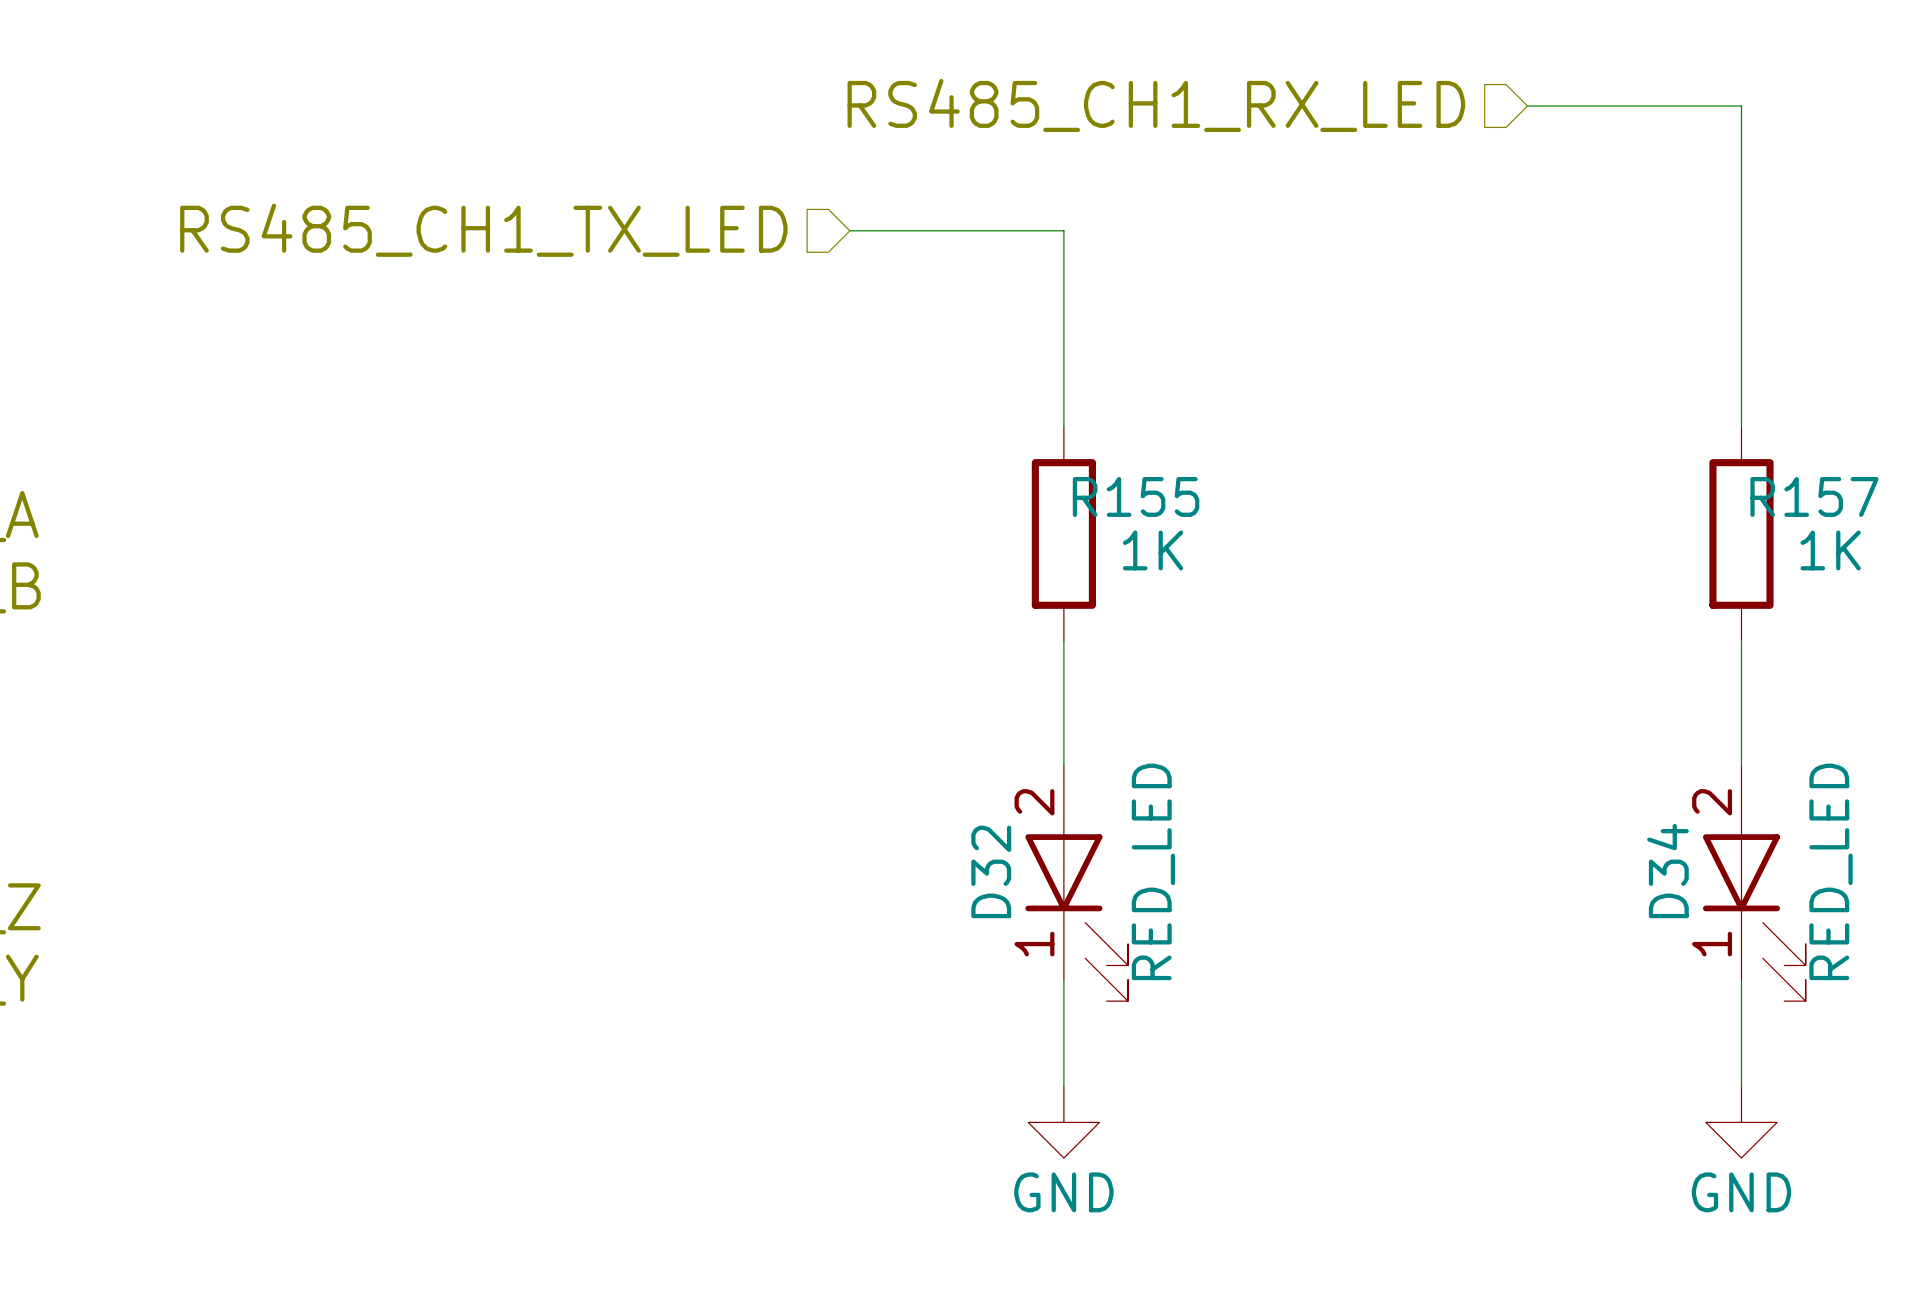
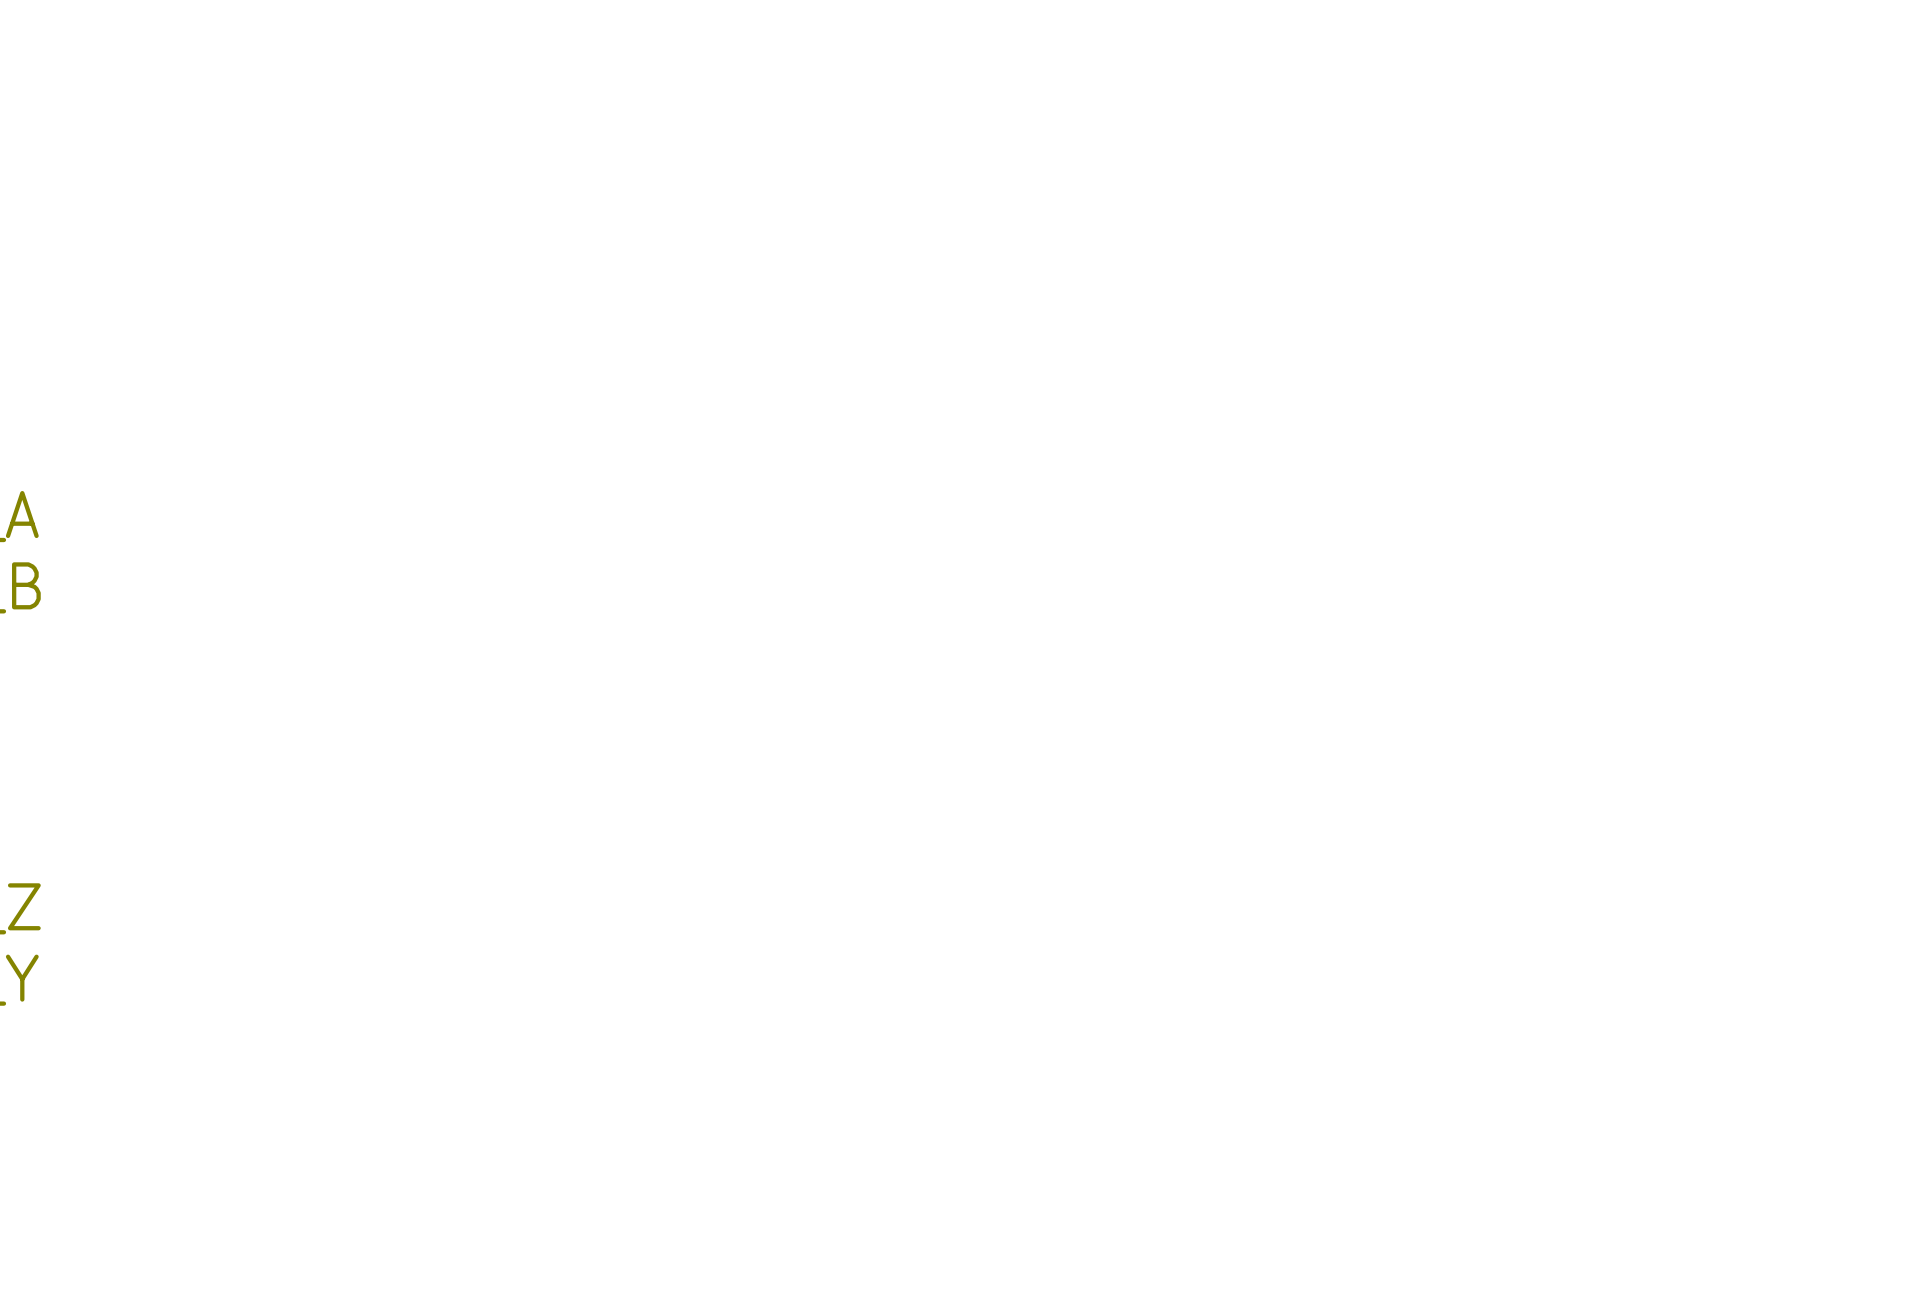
hierarchical label: RS485_CH1_RX_LED (1156, 105) -> none
wire: (1527, 106) (1741, 106) (1741, 426) -> none
hierarchical label: RS485_CH1_TX_LED (483, 230) -> none
wire: (849, 230) (1063, 230) (1063, 426) -> none
R155: 1K (1063, 533) -> none
R157: 1K (1741, 533) -> none
wire: (1063, 640) (1063, 765) -> none
wire: (1741, 640) (1741, 765) -> none
D32: RED_LED (1076, 883) -> none
D34: RED_LED (1754, 883) -> none
wire: (1063, 979) (1063, 1086) -> none
wire: (1741, 979) (1741, 1086) -> none
power symbol: GND (1063, 1122) -> none
power symbol: GND (1741, 1122) -> none

